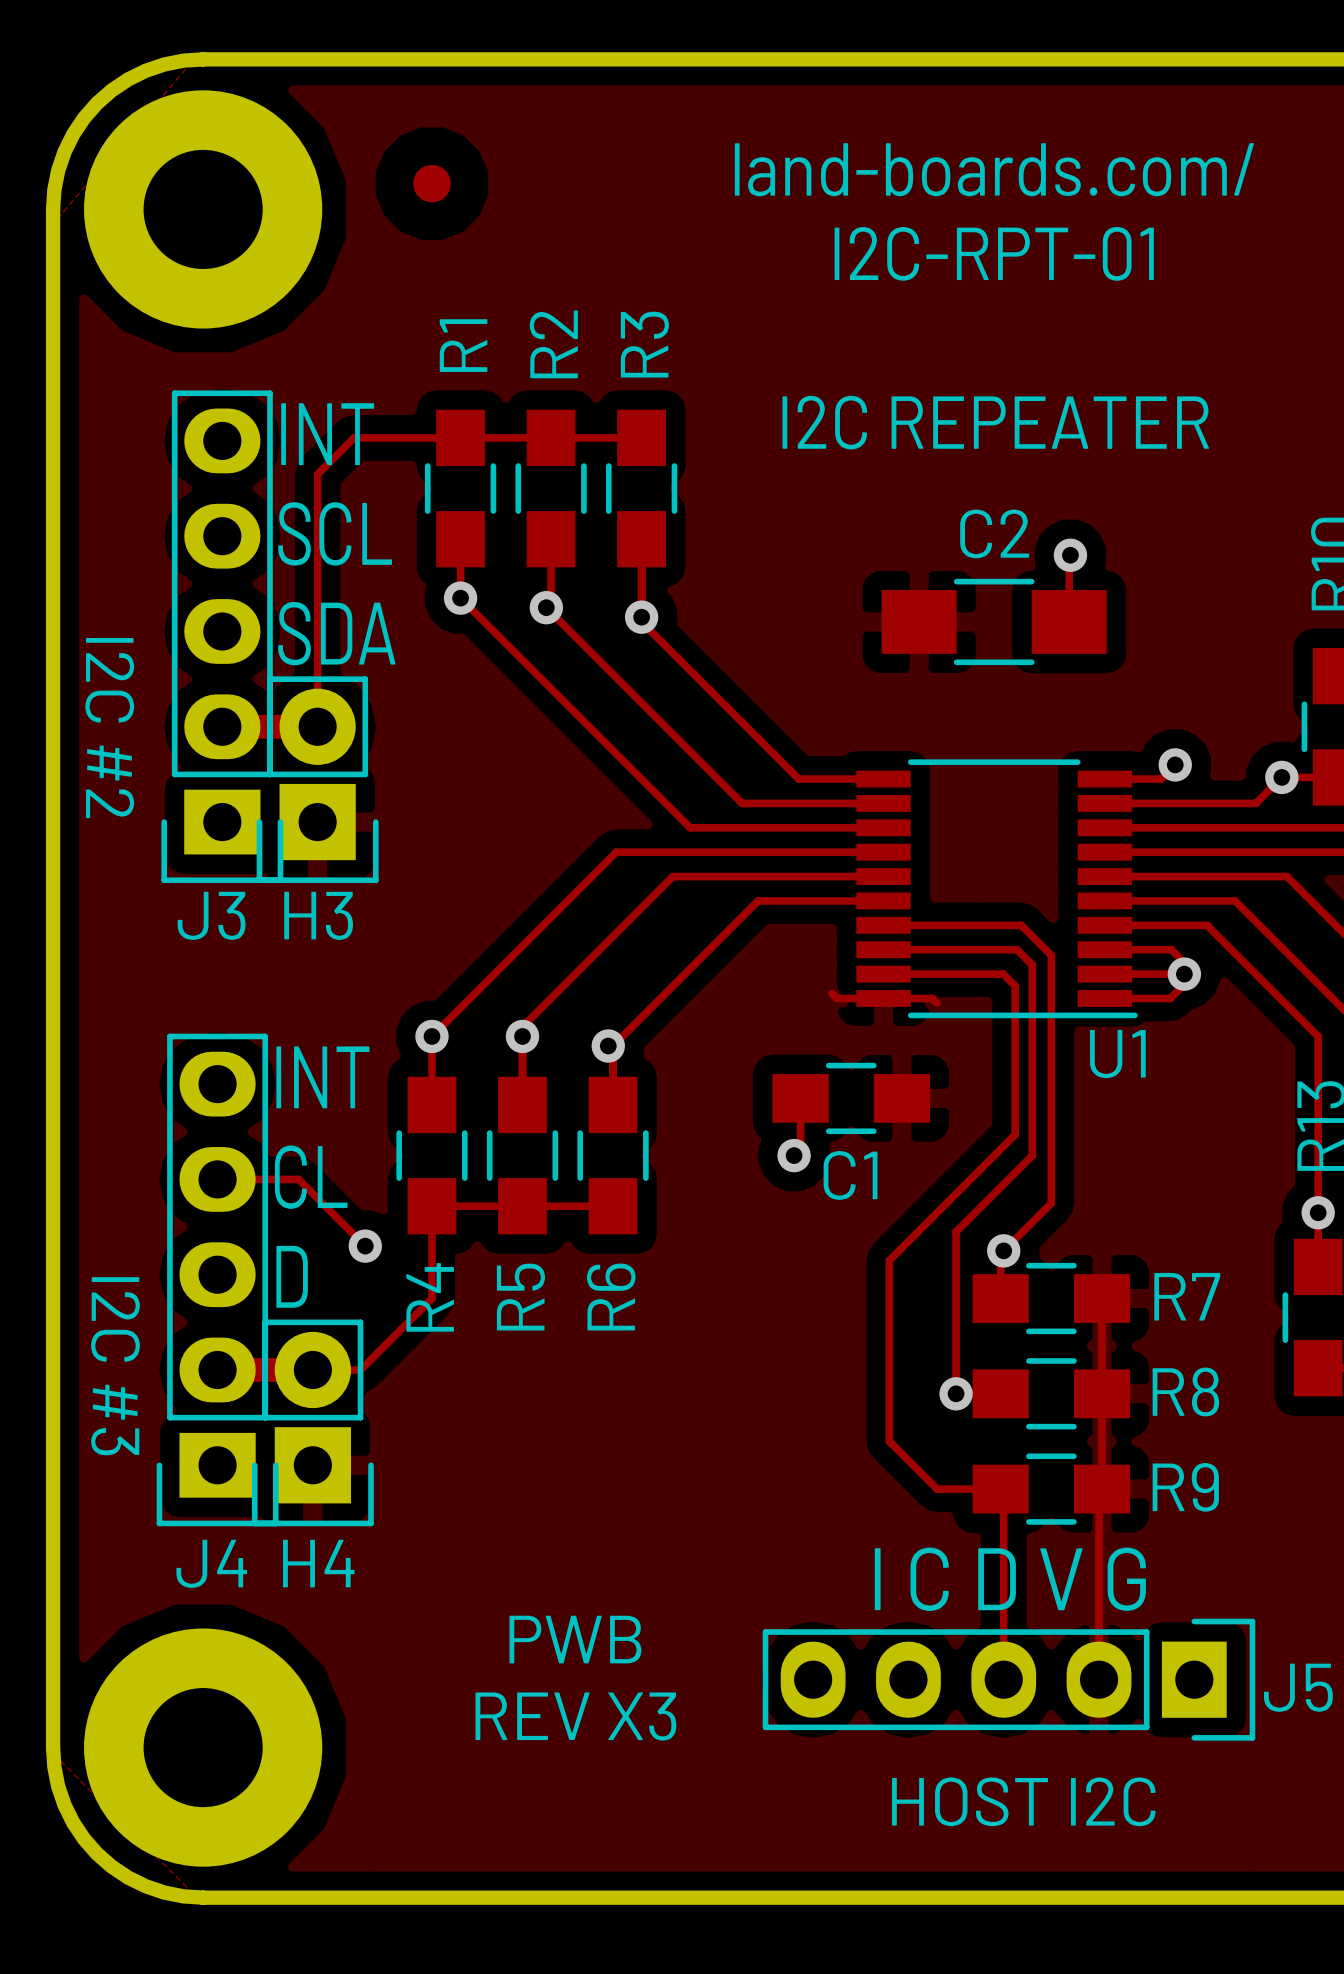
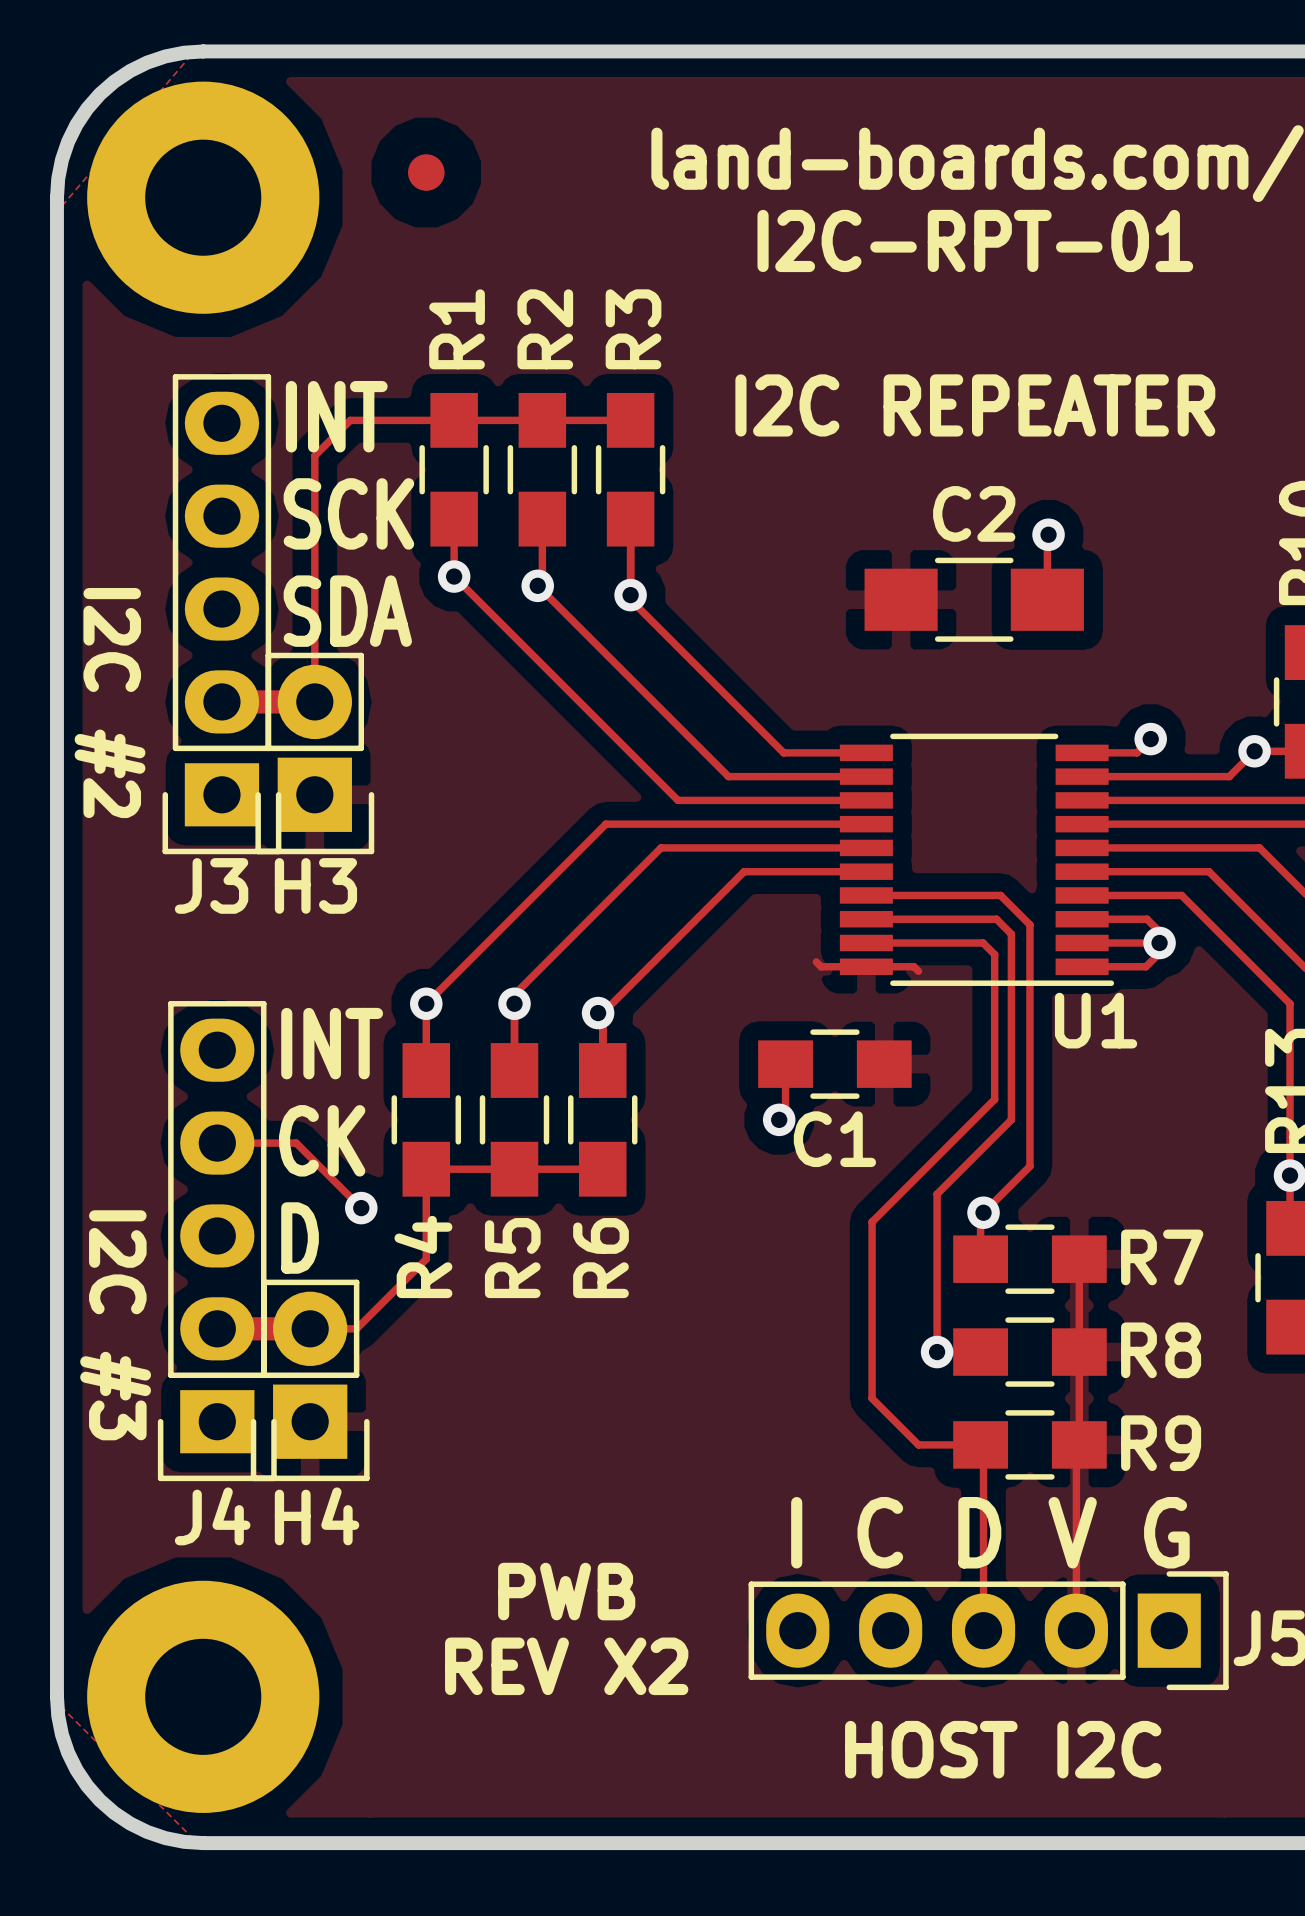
text: SCL (335, 533) -> SCK (348, 513)
text: CL (311, 1177) -> CK (322, 1140)
text: REV X3 (575, 1716) -> REV X2 (566, 1666)

